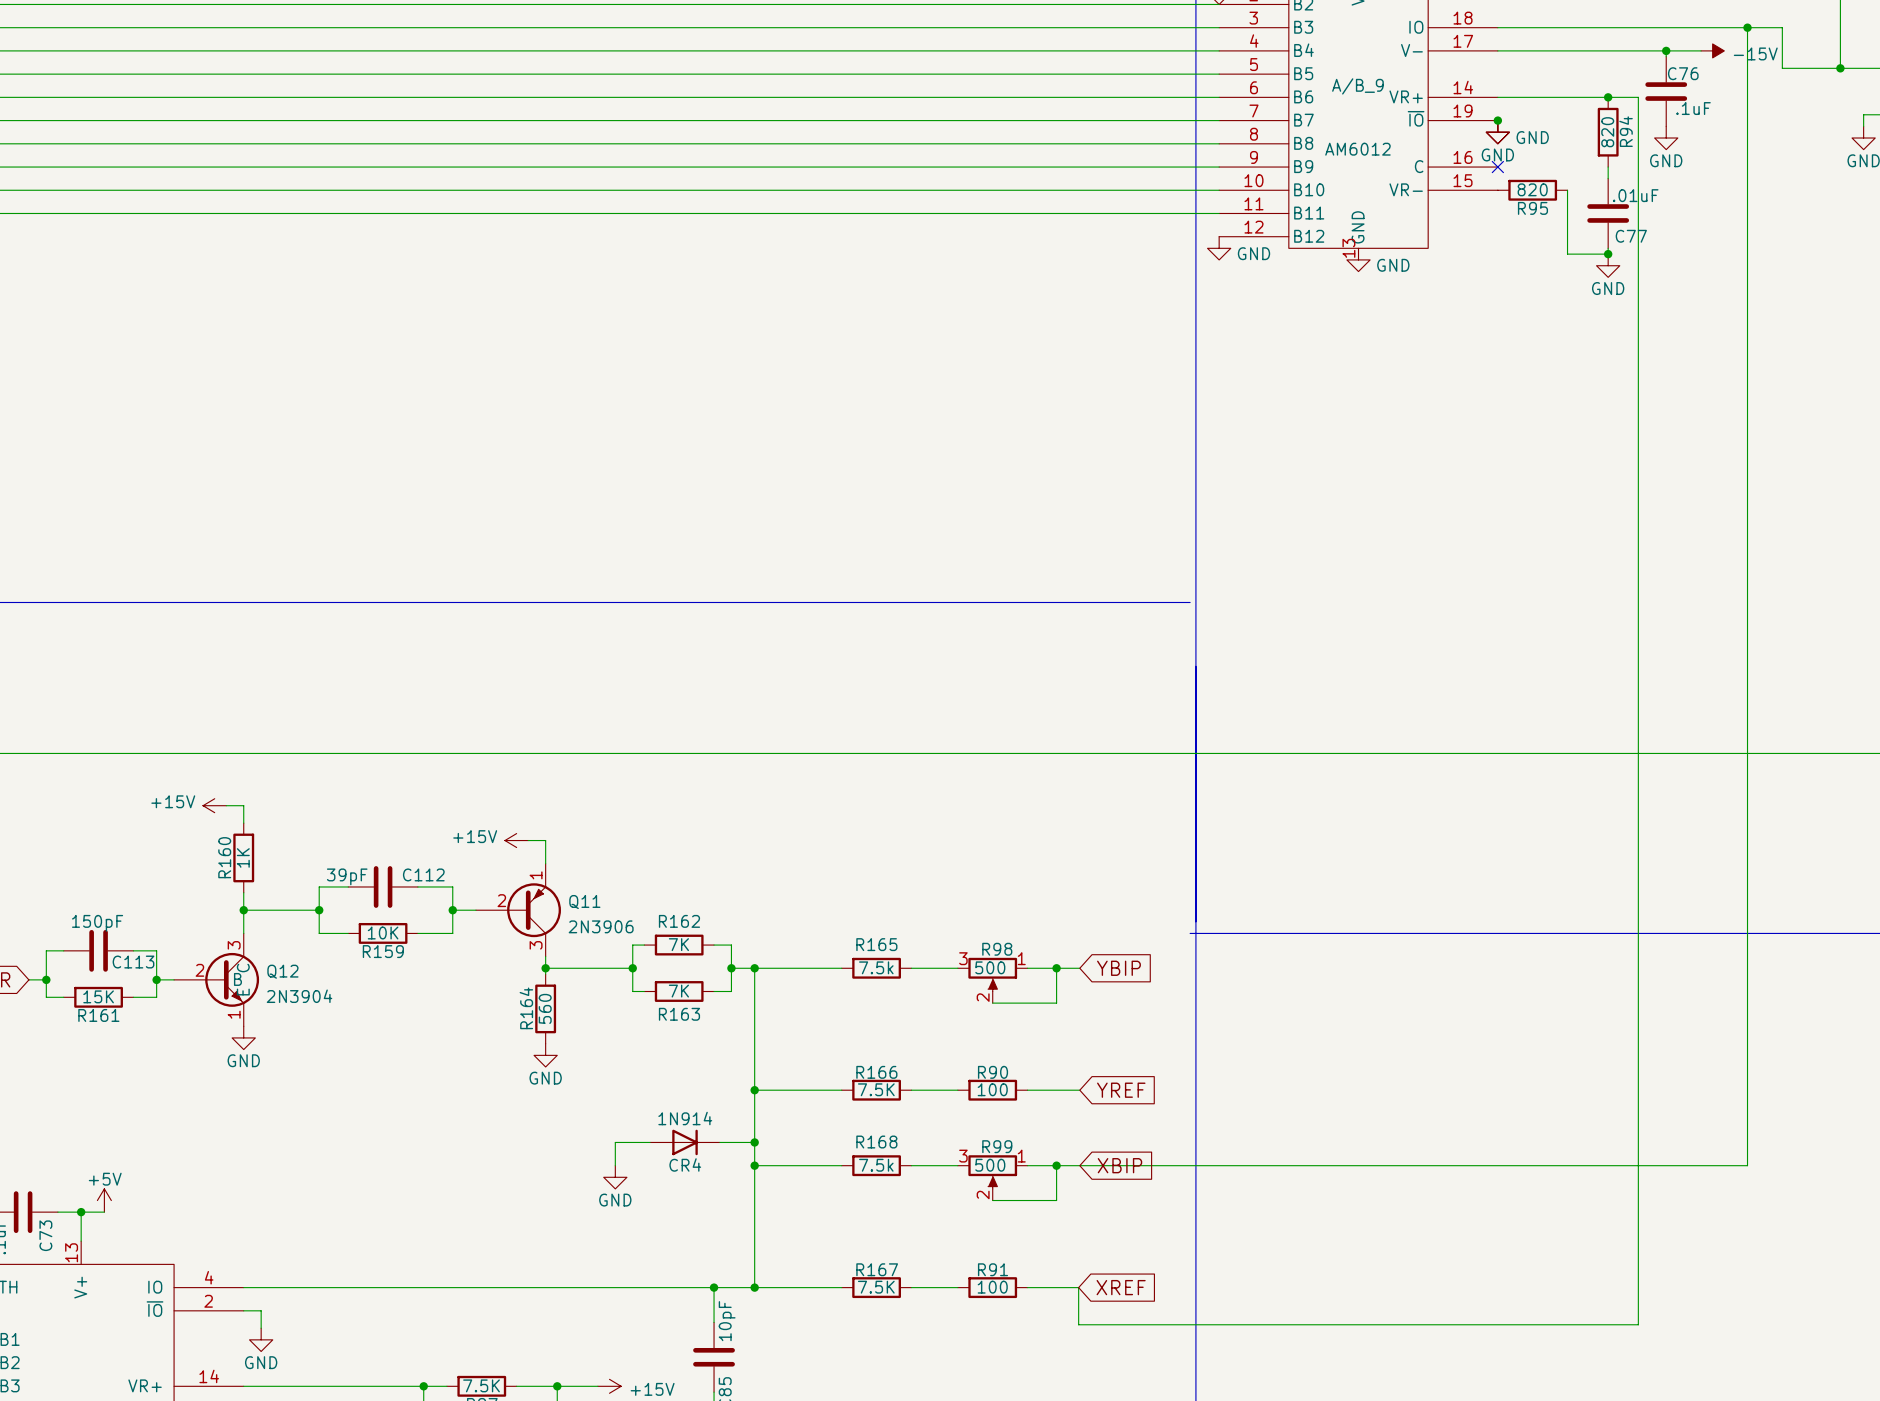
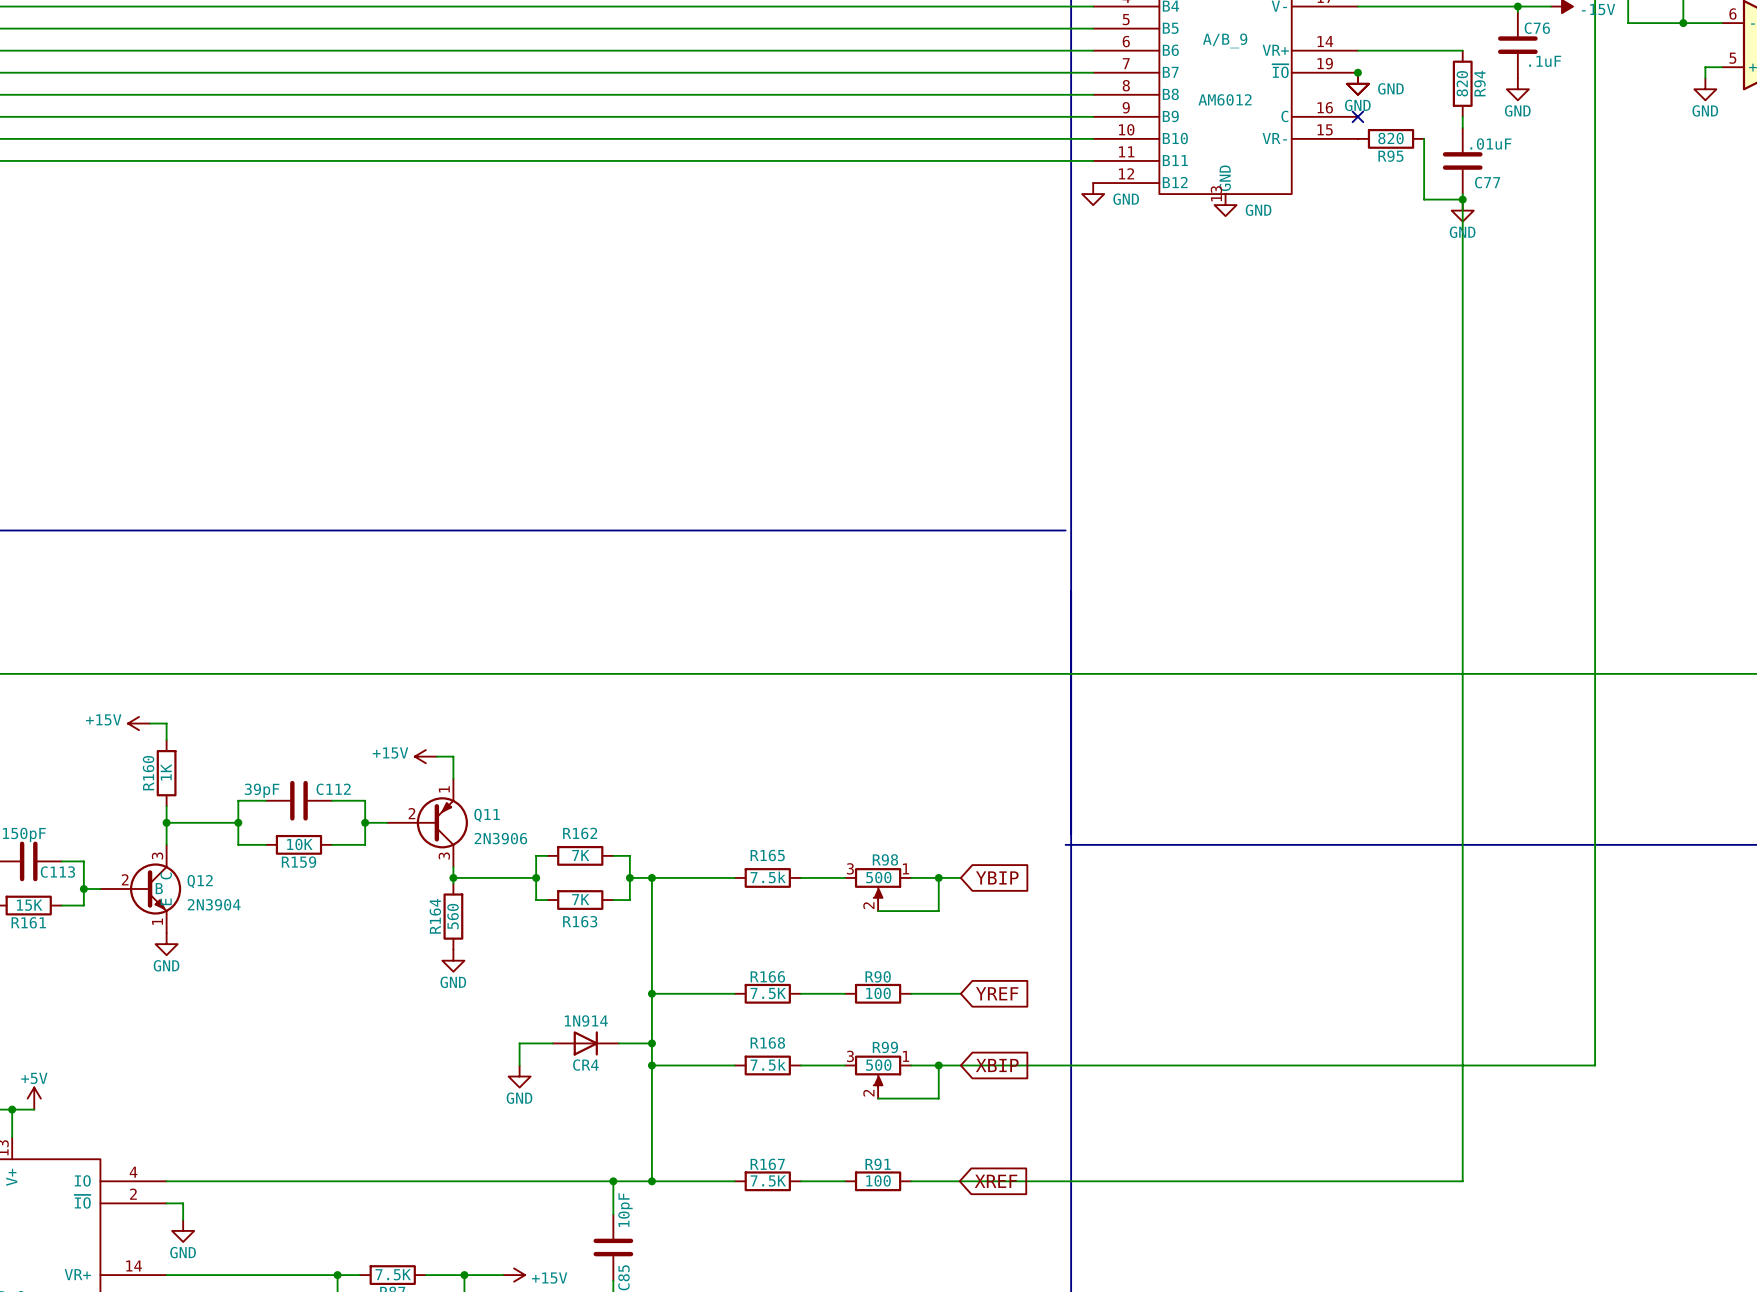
wire: (1608, 97) (1638, 97) (1638, 1324) (1078, 1324) (1078, 1287) -> (1462, 199) (1462, 1181) (959, 1181)
junction: (1608, 97) -> none

